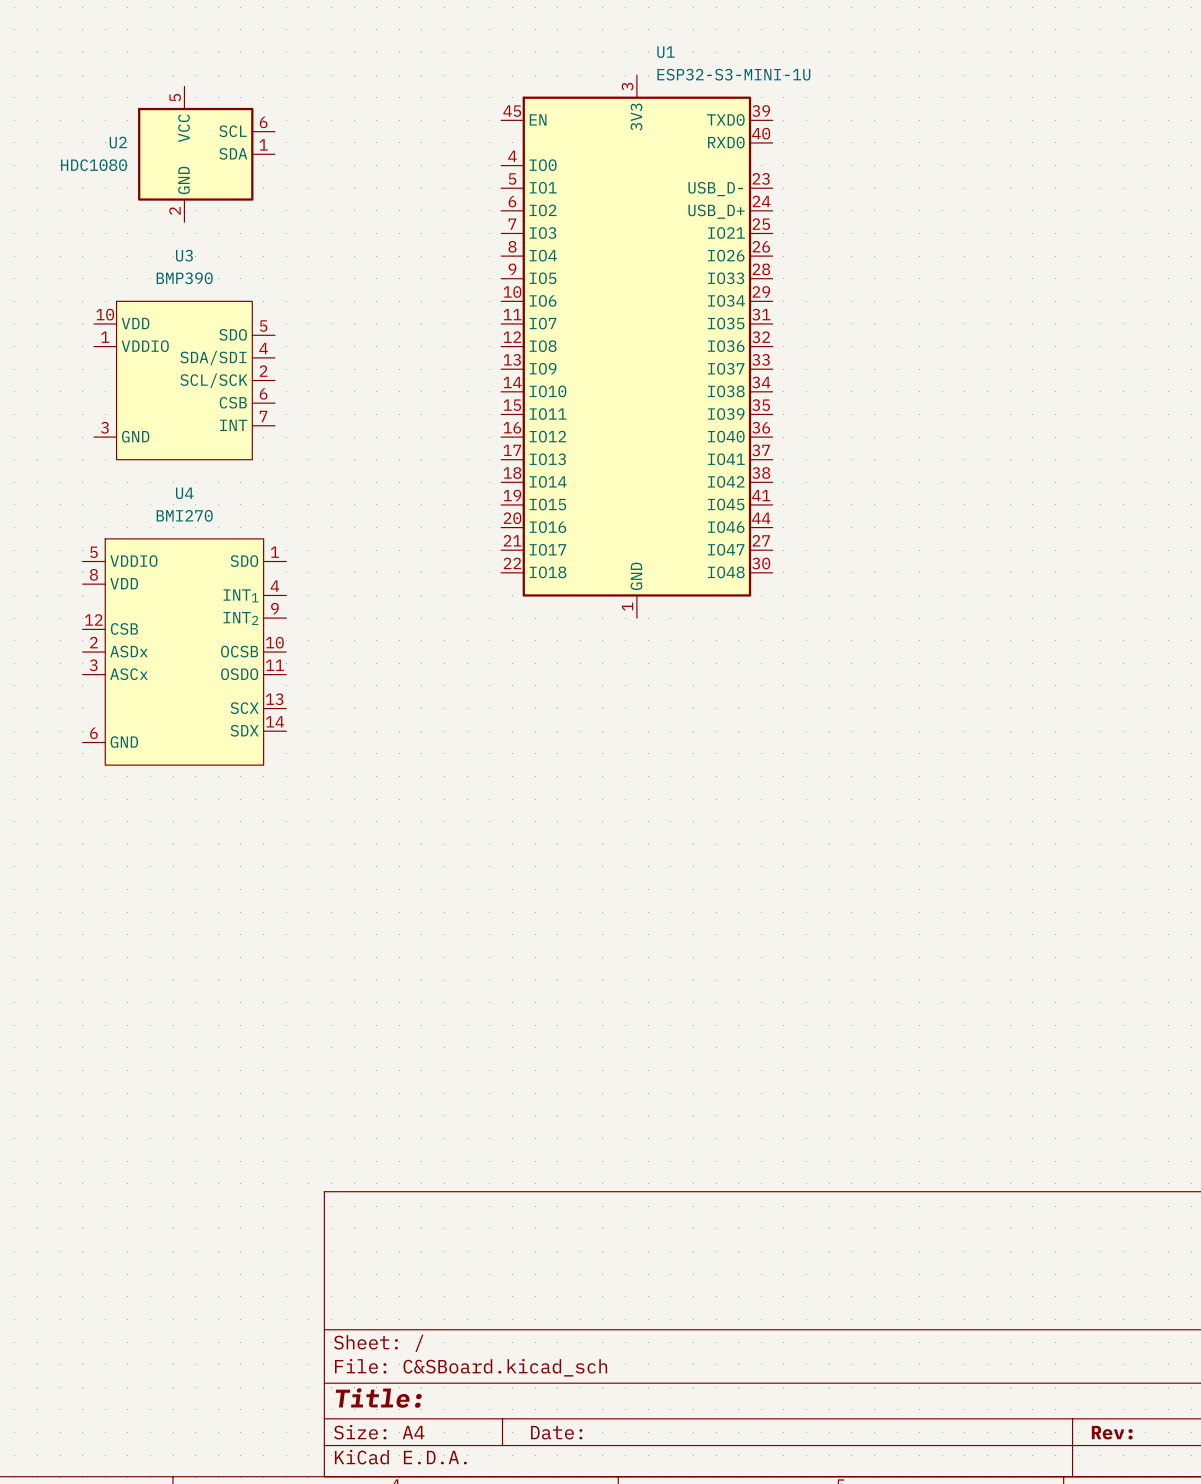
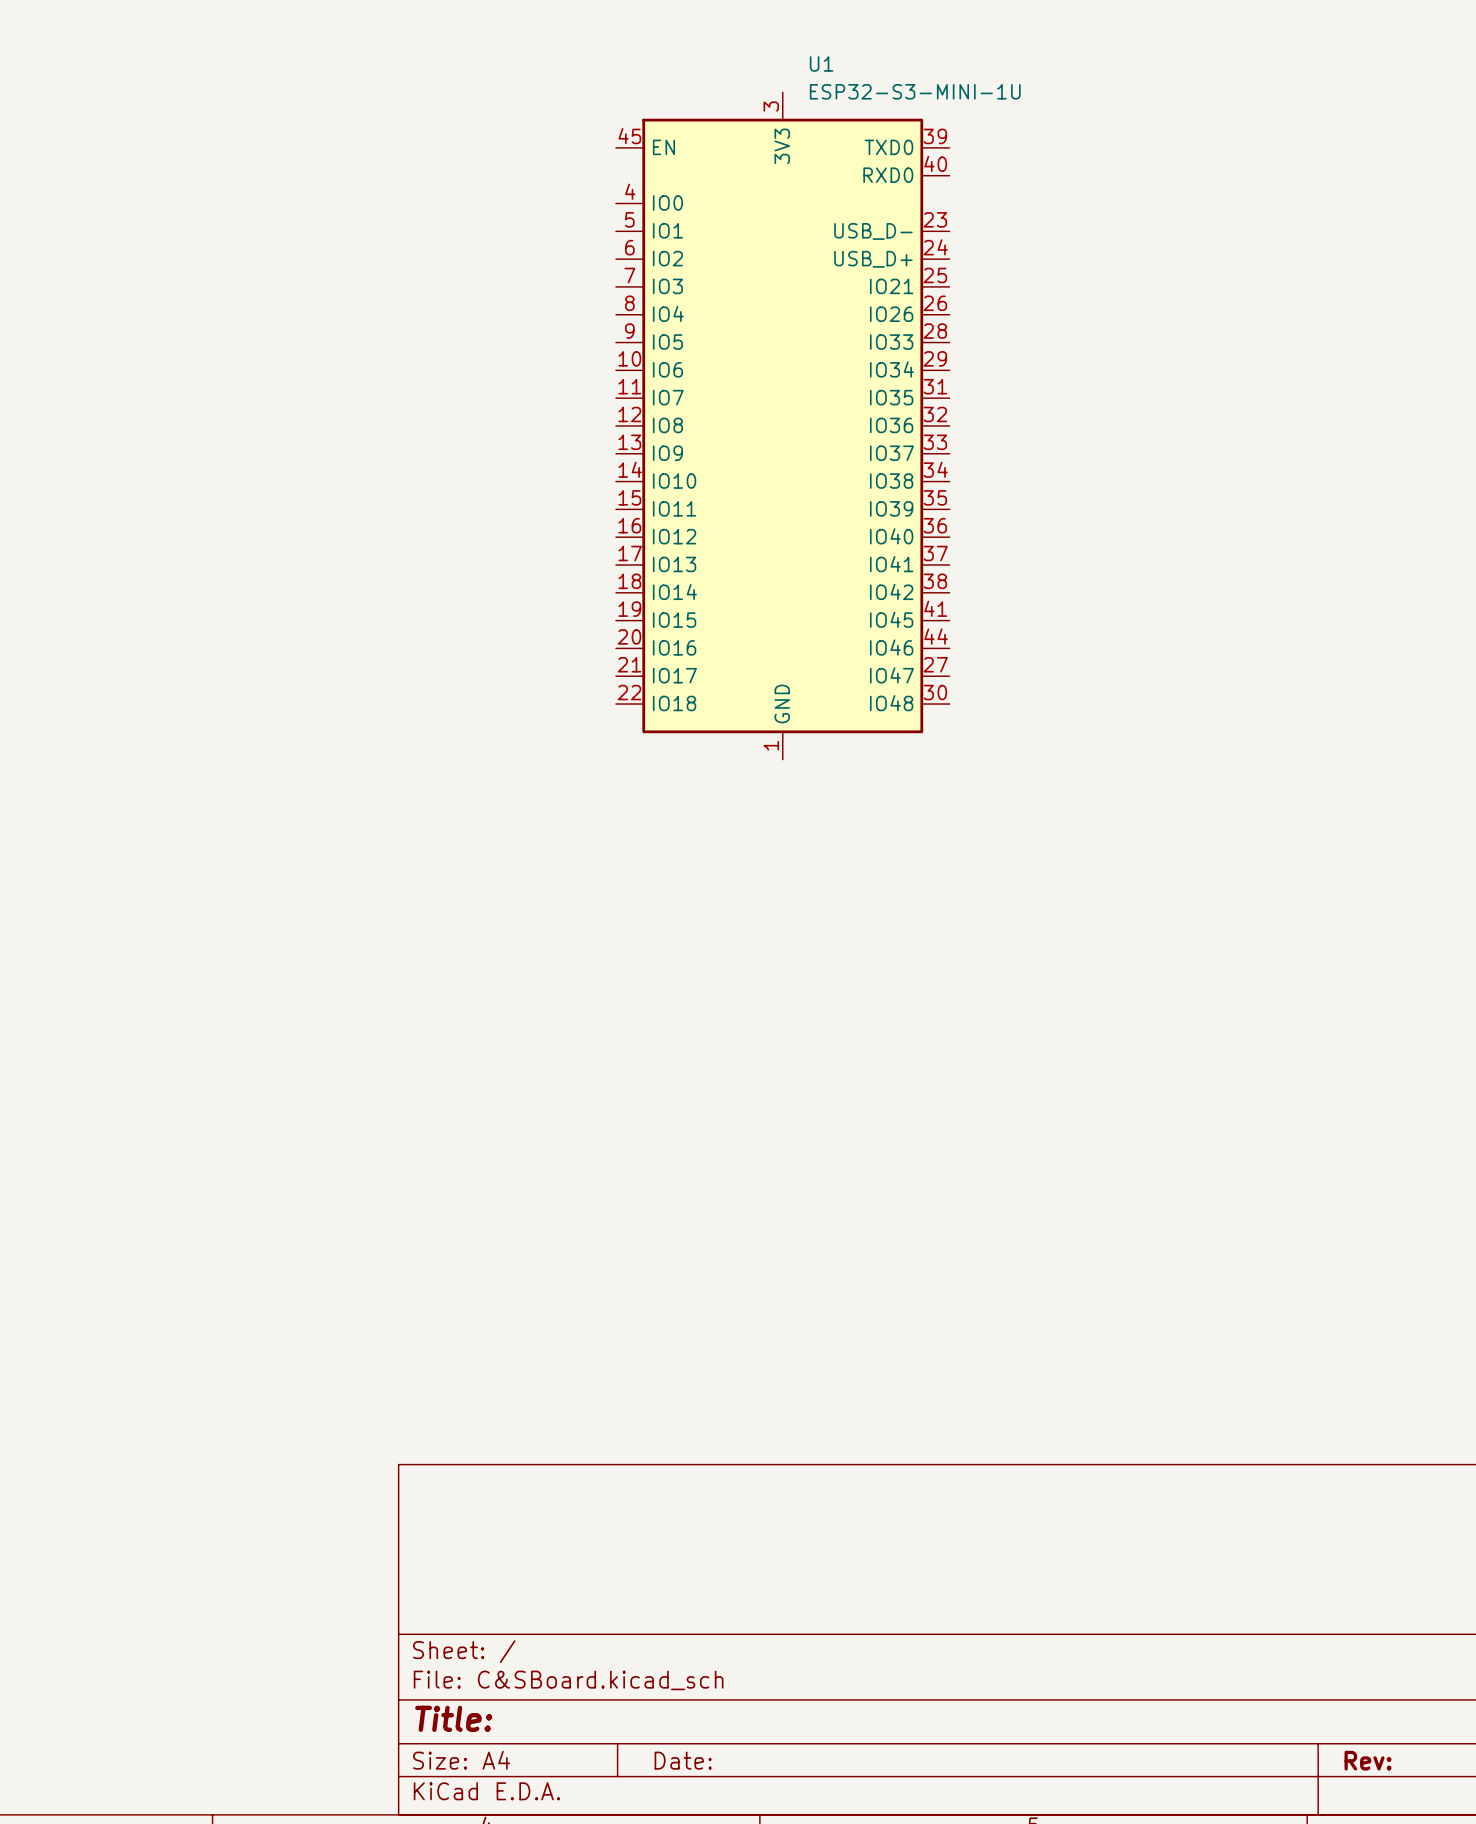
U2: HDC1080 (206, 154) -> none
U3: BMP390 (184, 380) -> none
U4: BMI270 (184, 652) -> none

